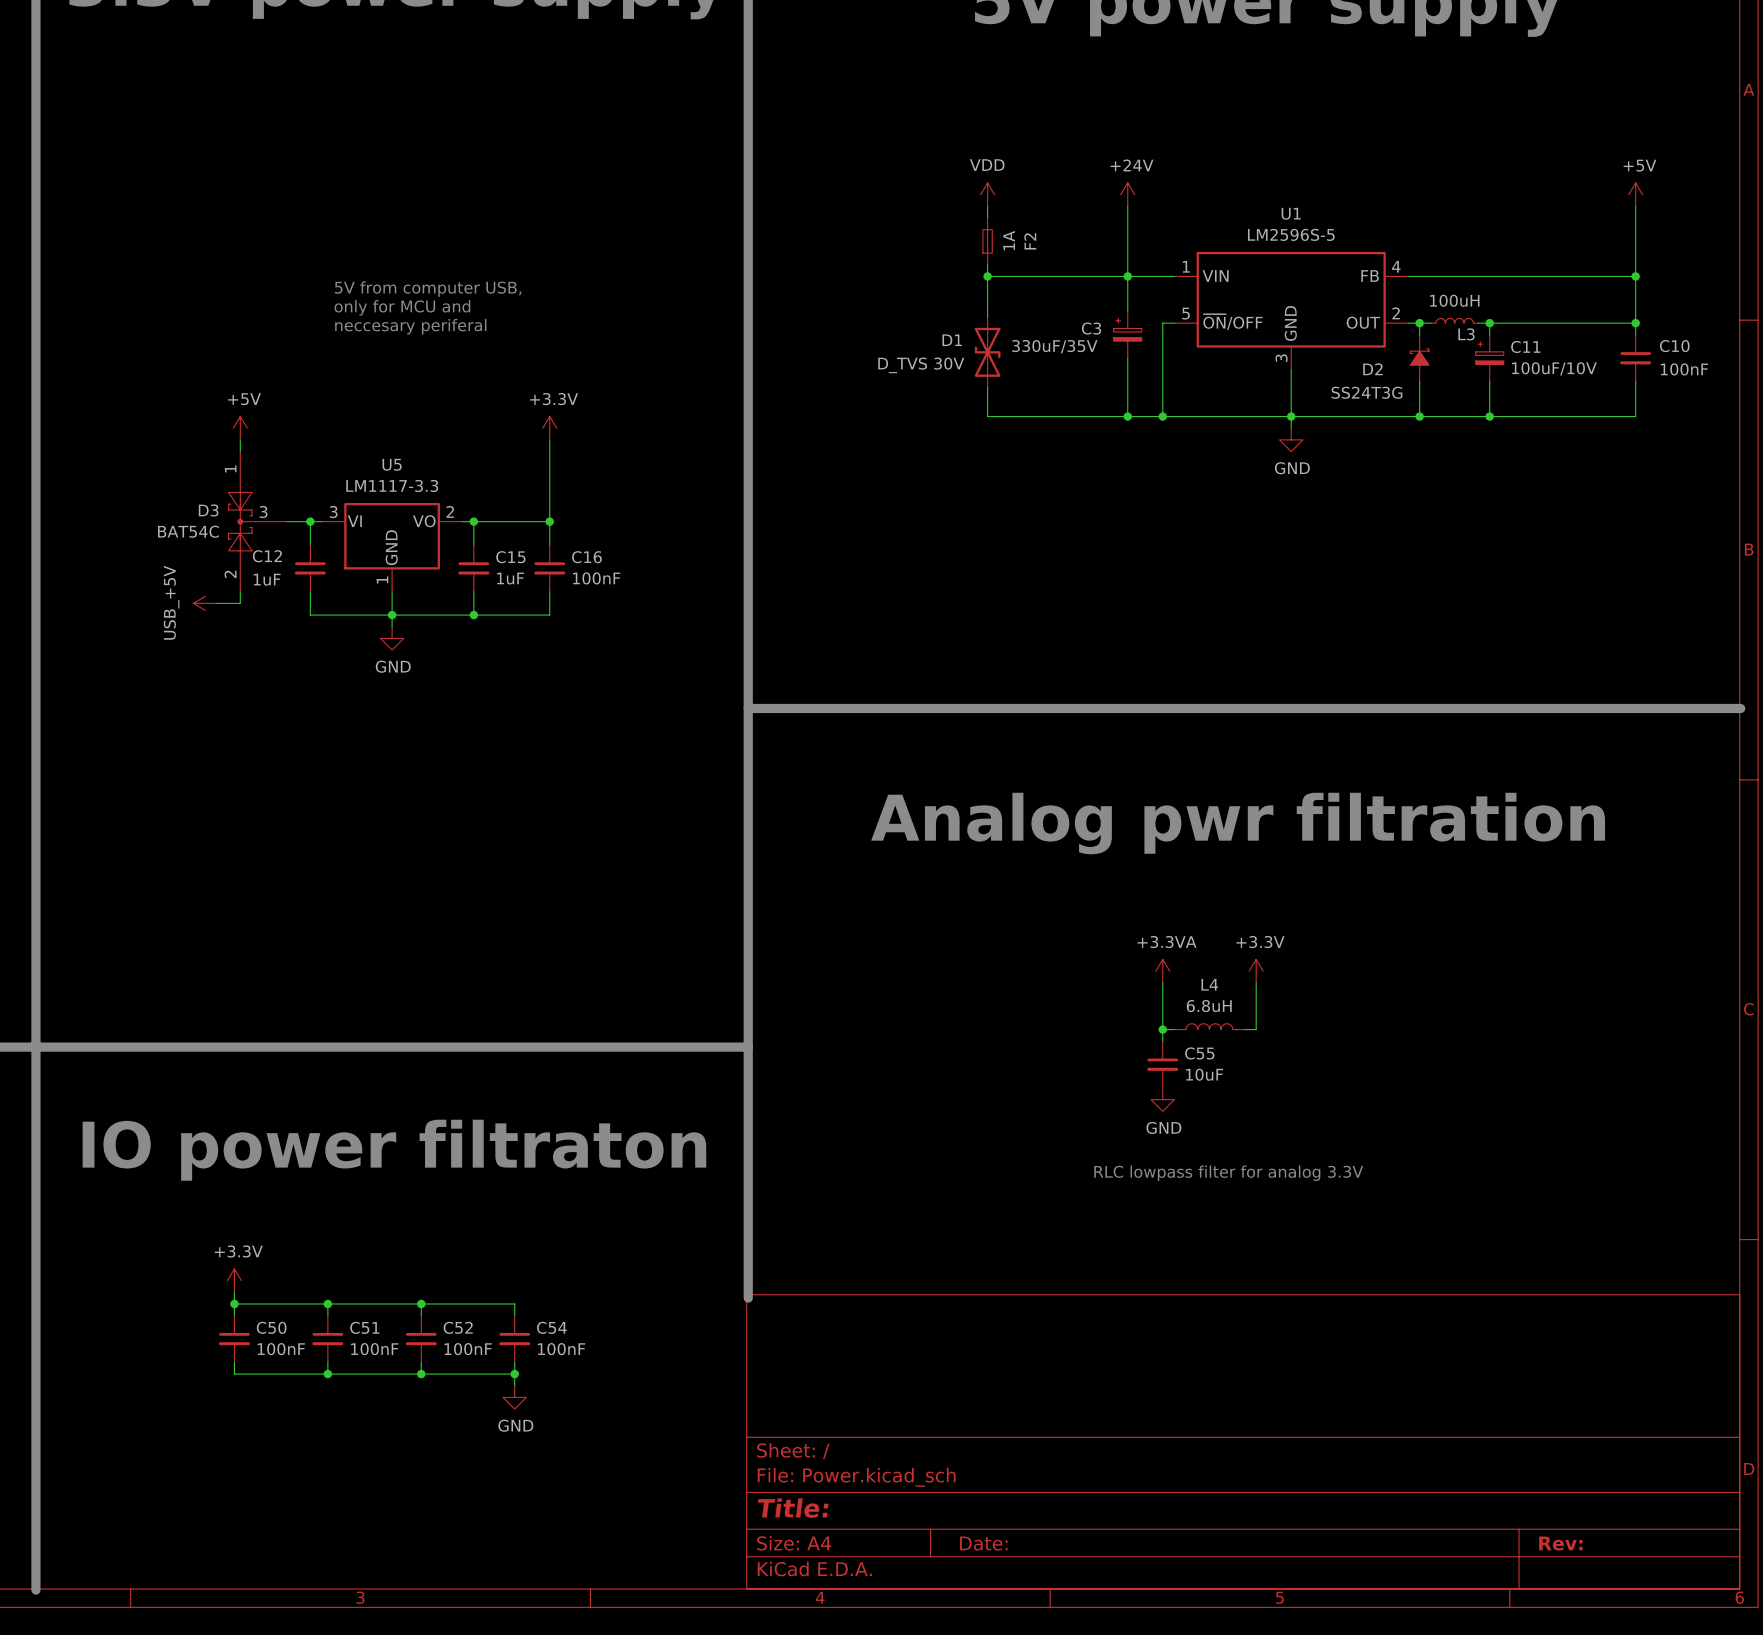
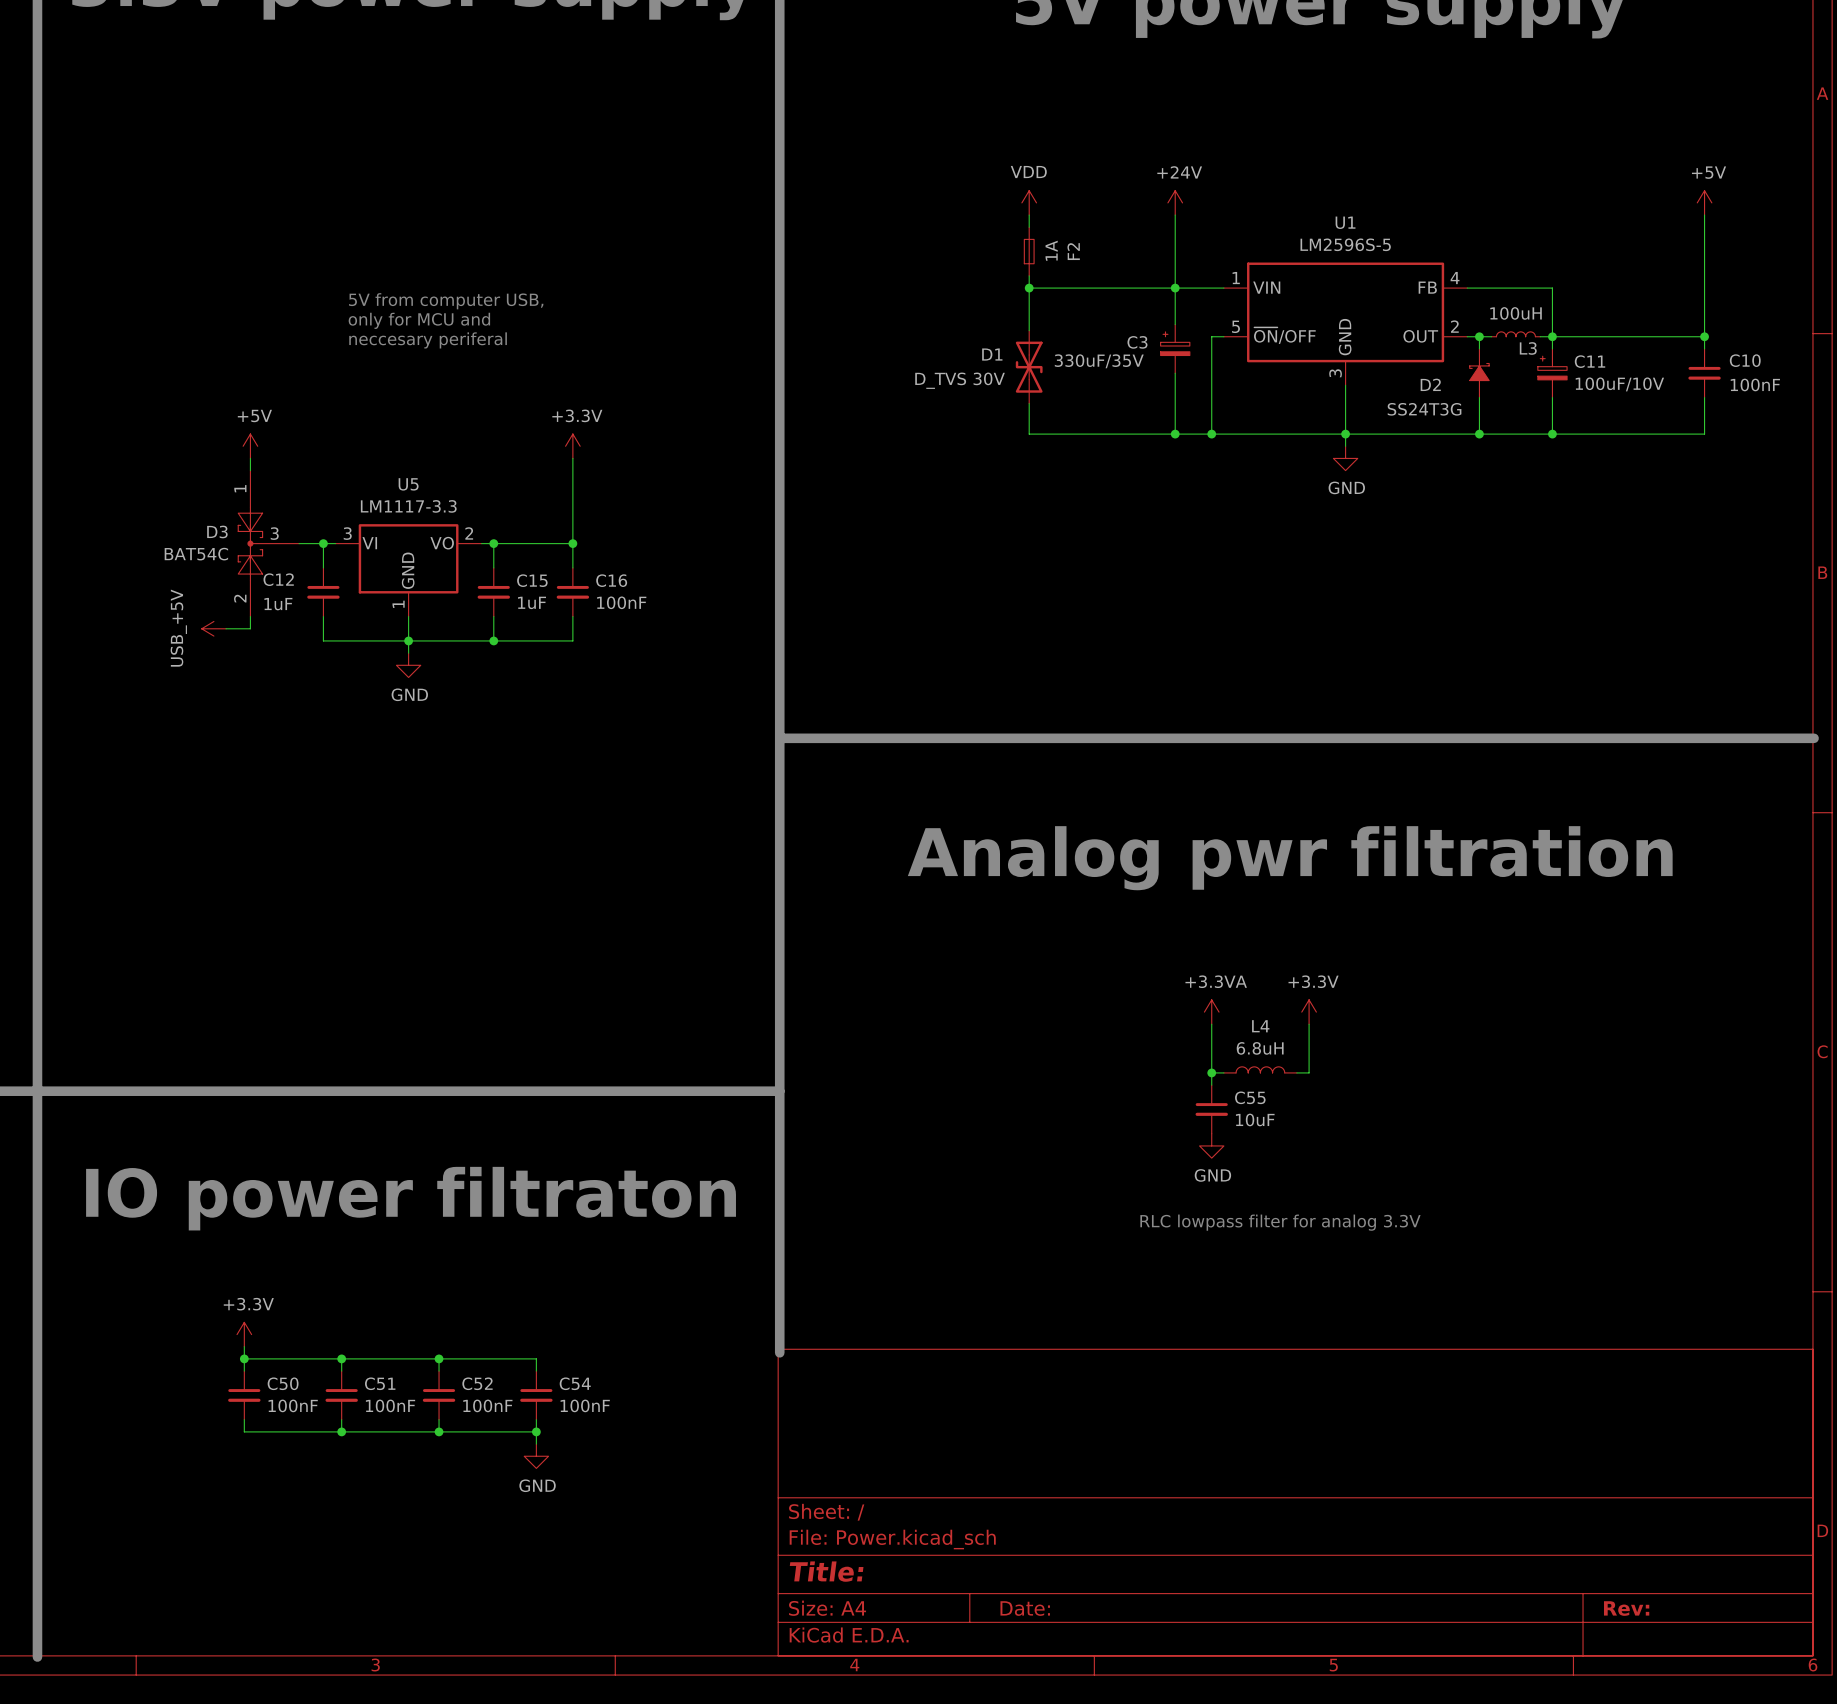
wire: (1489, 276) (1635, 276) -> (1552, 288) (1552, 336)
junction: (1635, 276) -> none

